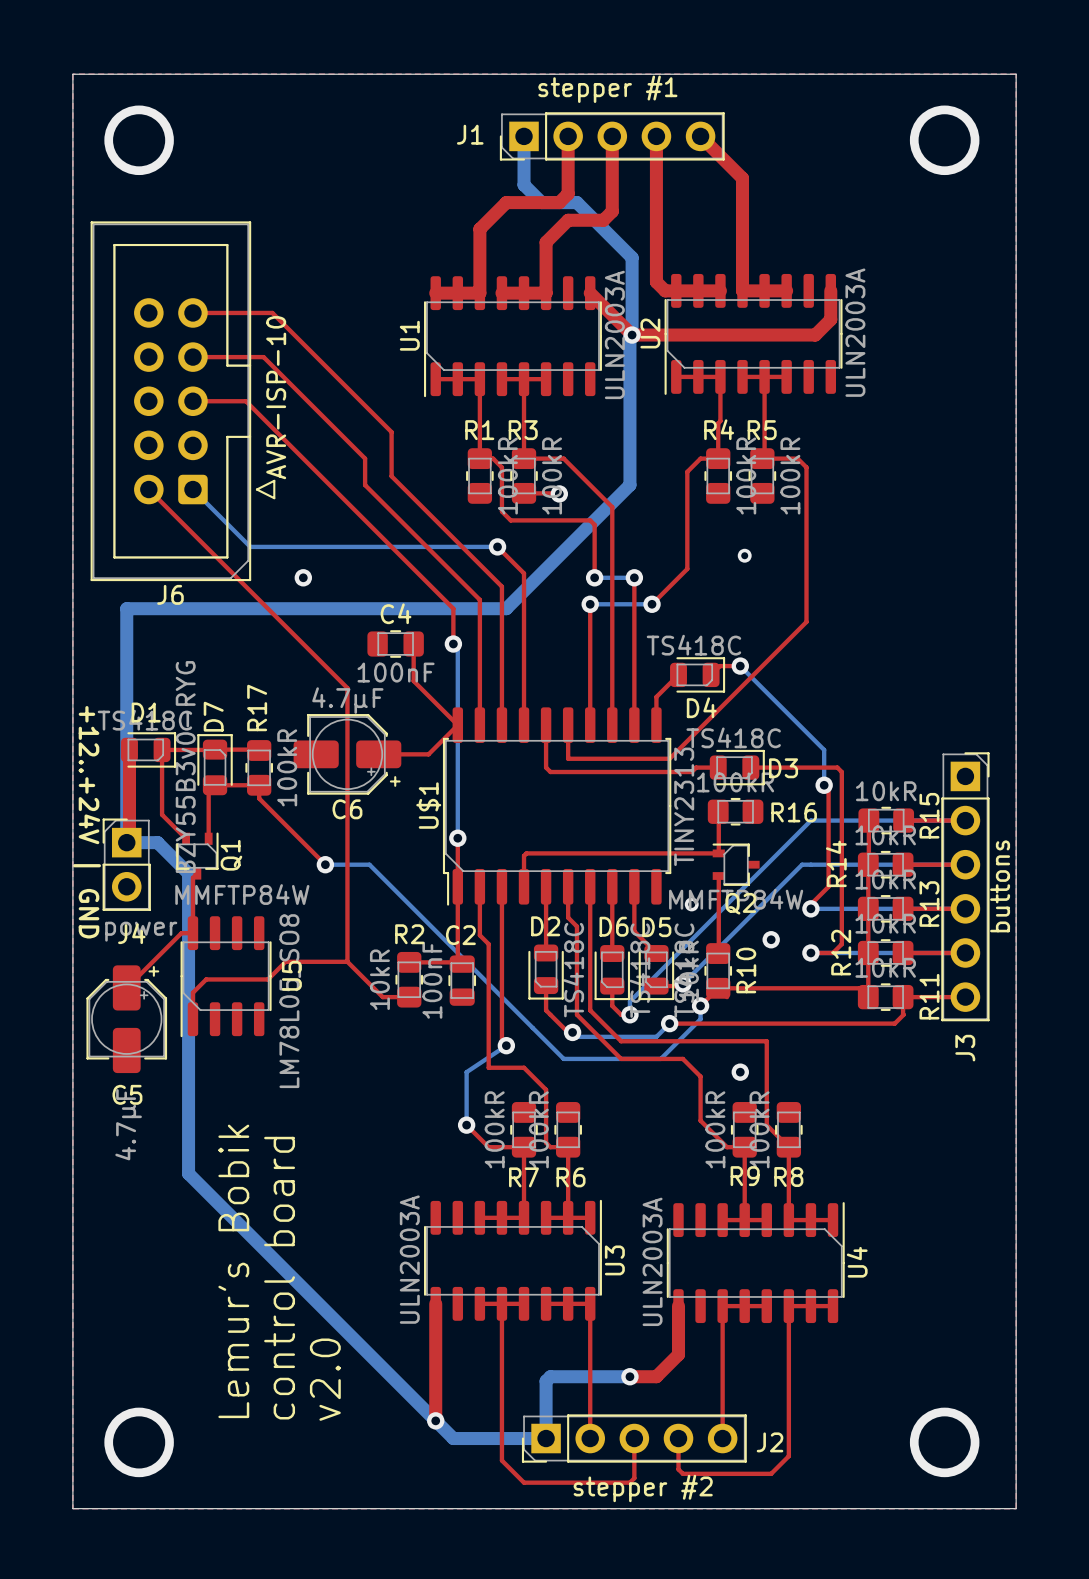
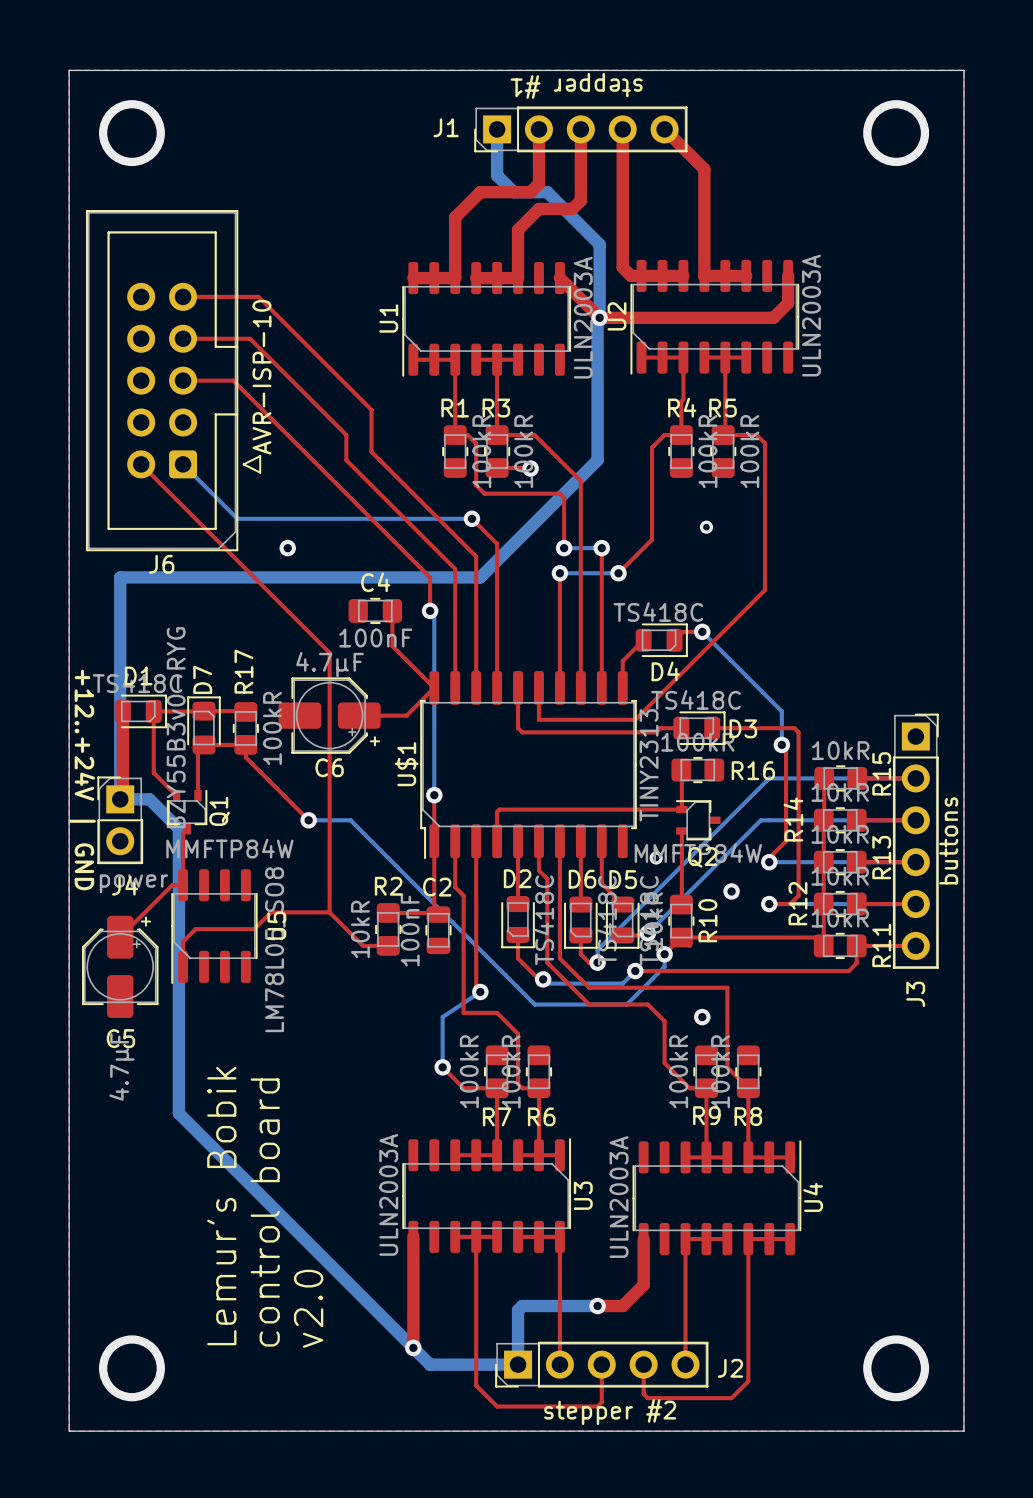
J1 value rotation: 0° (607, 89) -> 180° (576, 85)

